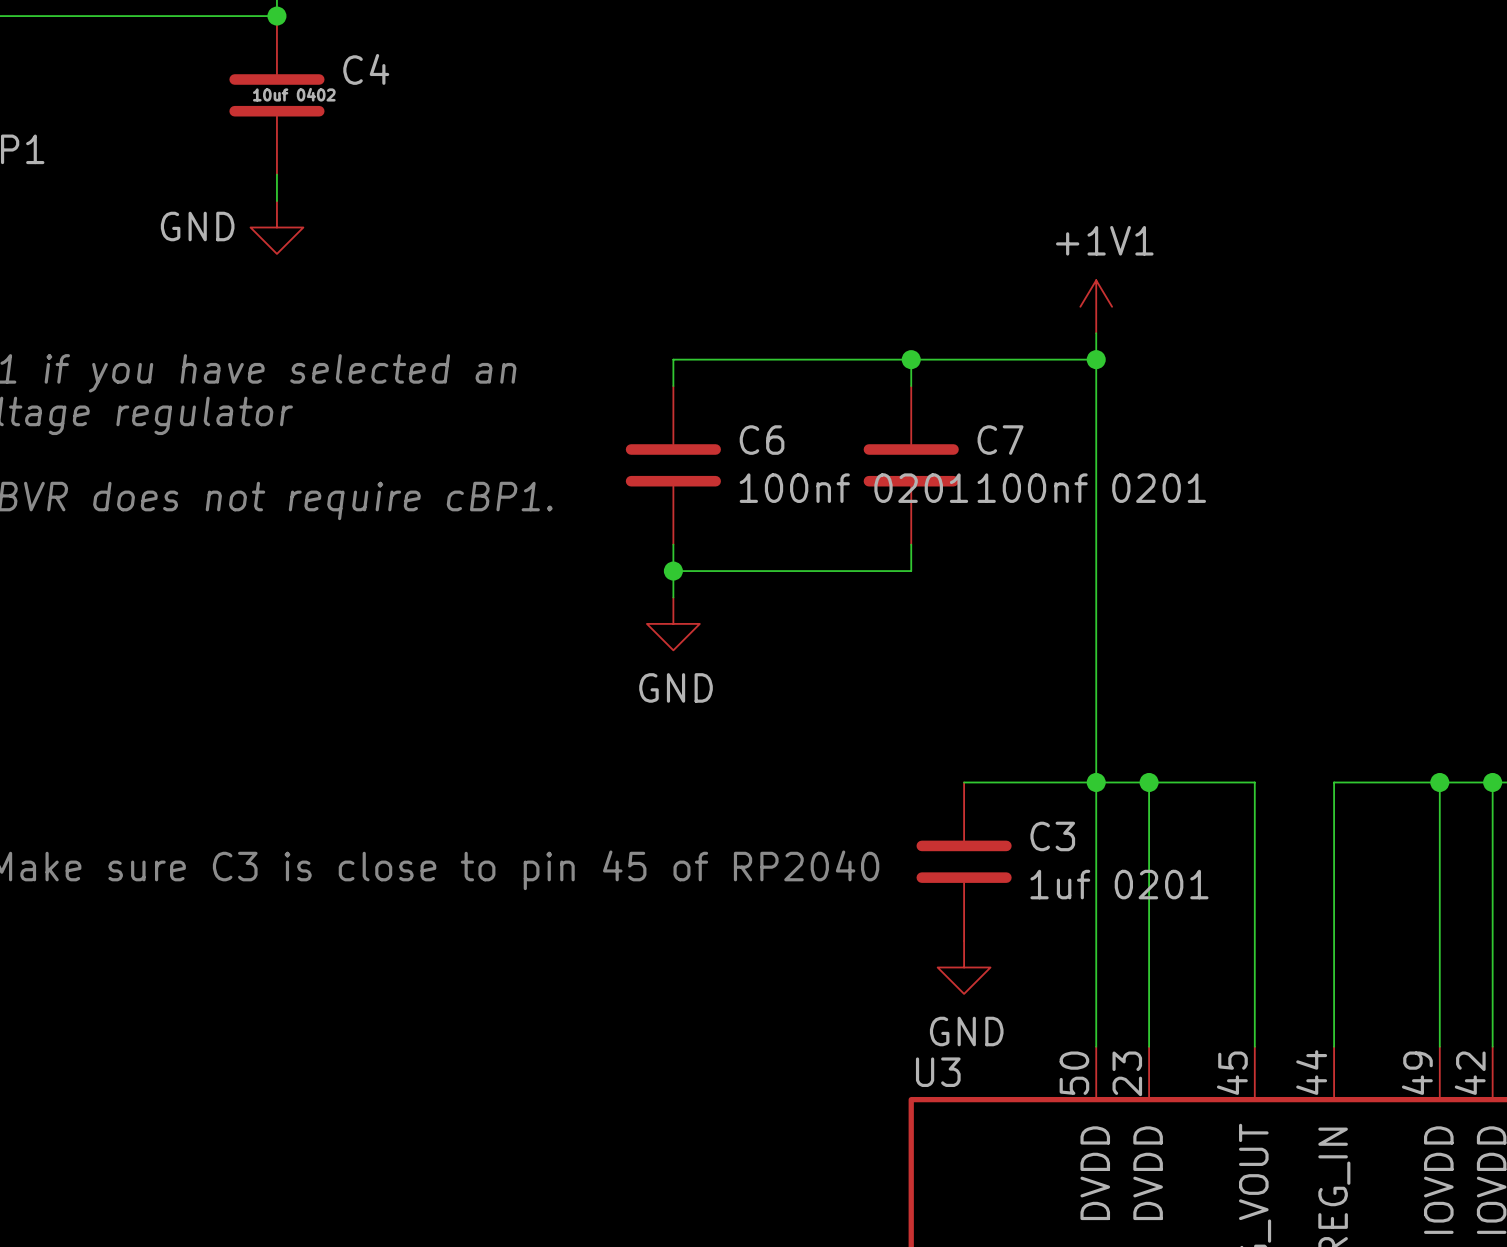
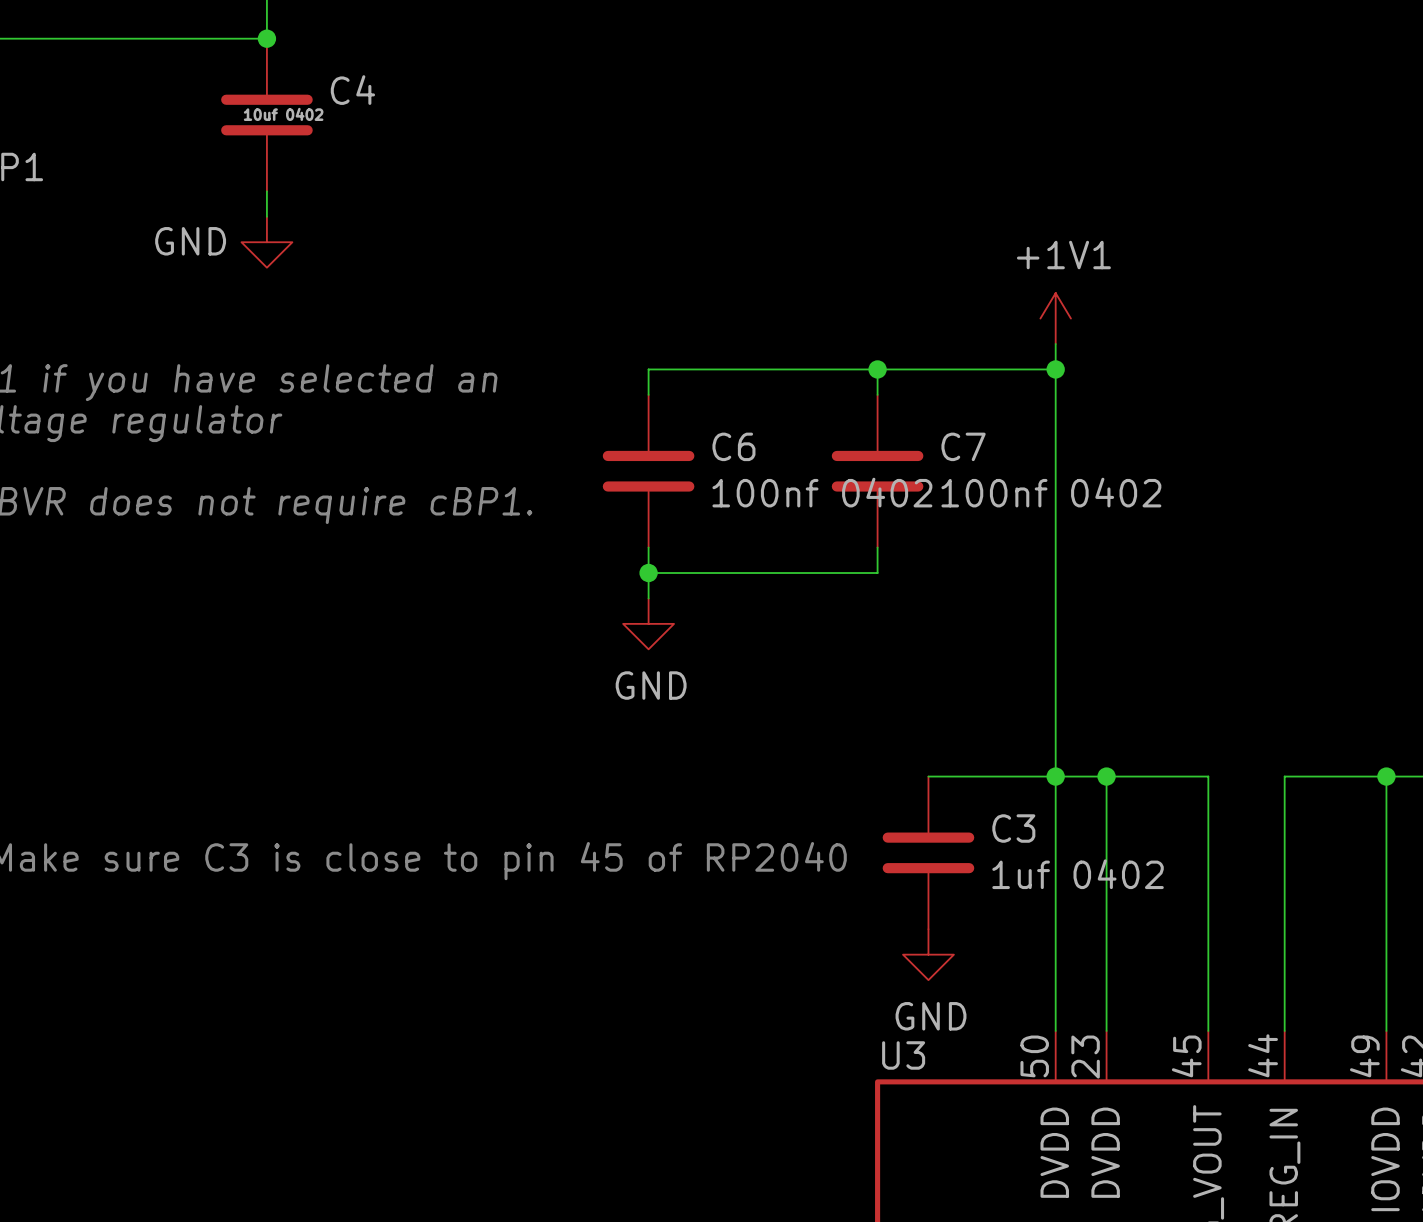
C6 value: 100nf 0201 (853, 488) -> 100nf 0402 (822, 492)
C7 value: 100nf 0201 (1091, 488) -> 100nf 0402 (1051, 492)
C3 value: 1uf 0201 (1119, 884) -> 1uf 0402 (1078, 874)

